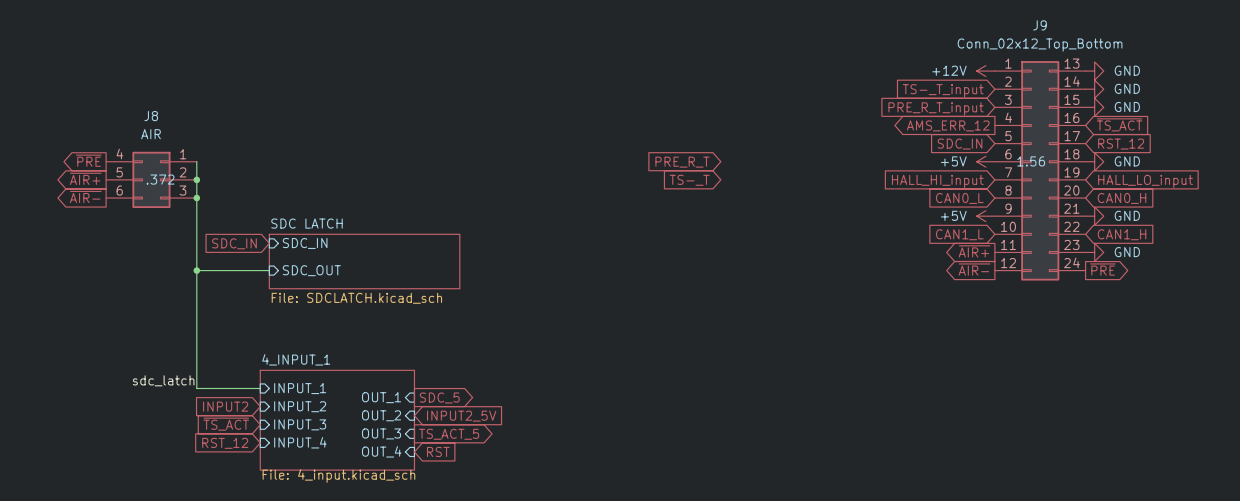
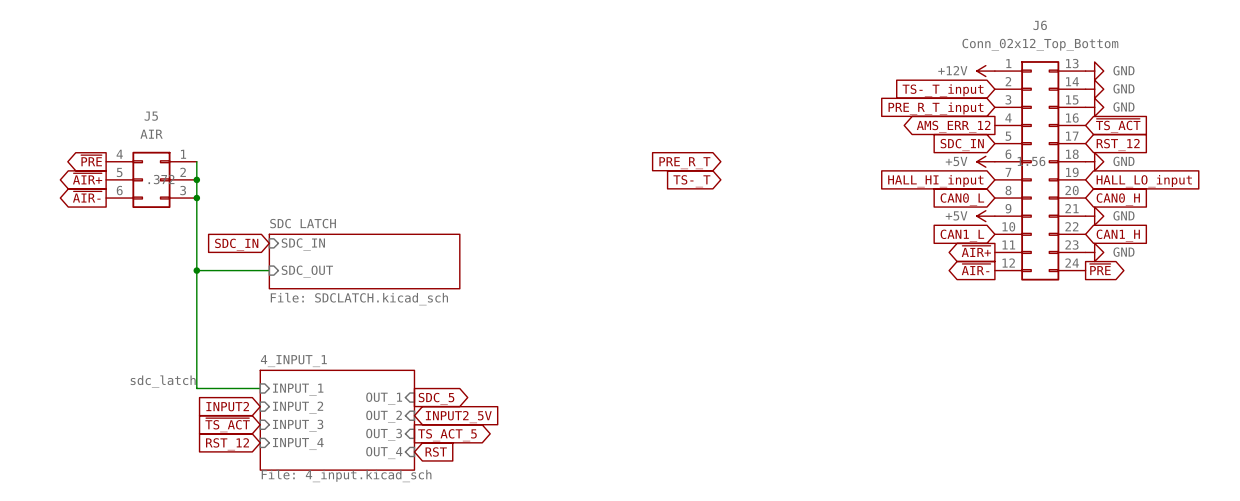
J9 name: J9 (1040, 25) -> J6 (1040, 25)
J8 name: J8 (151, 116) -> J5 (151, 116)

